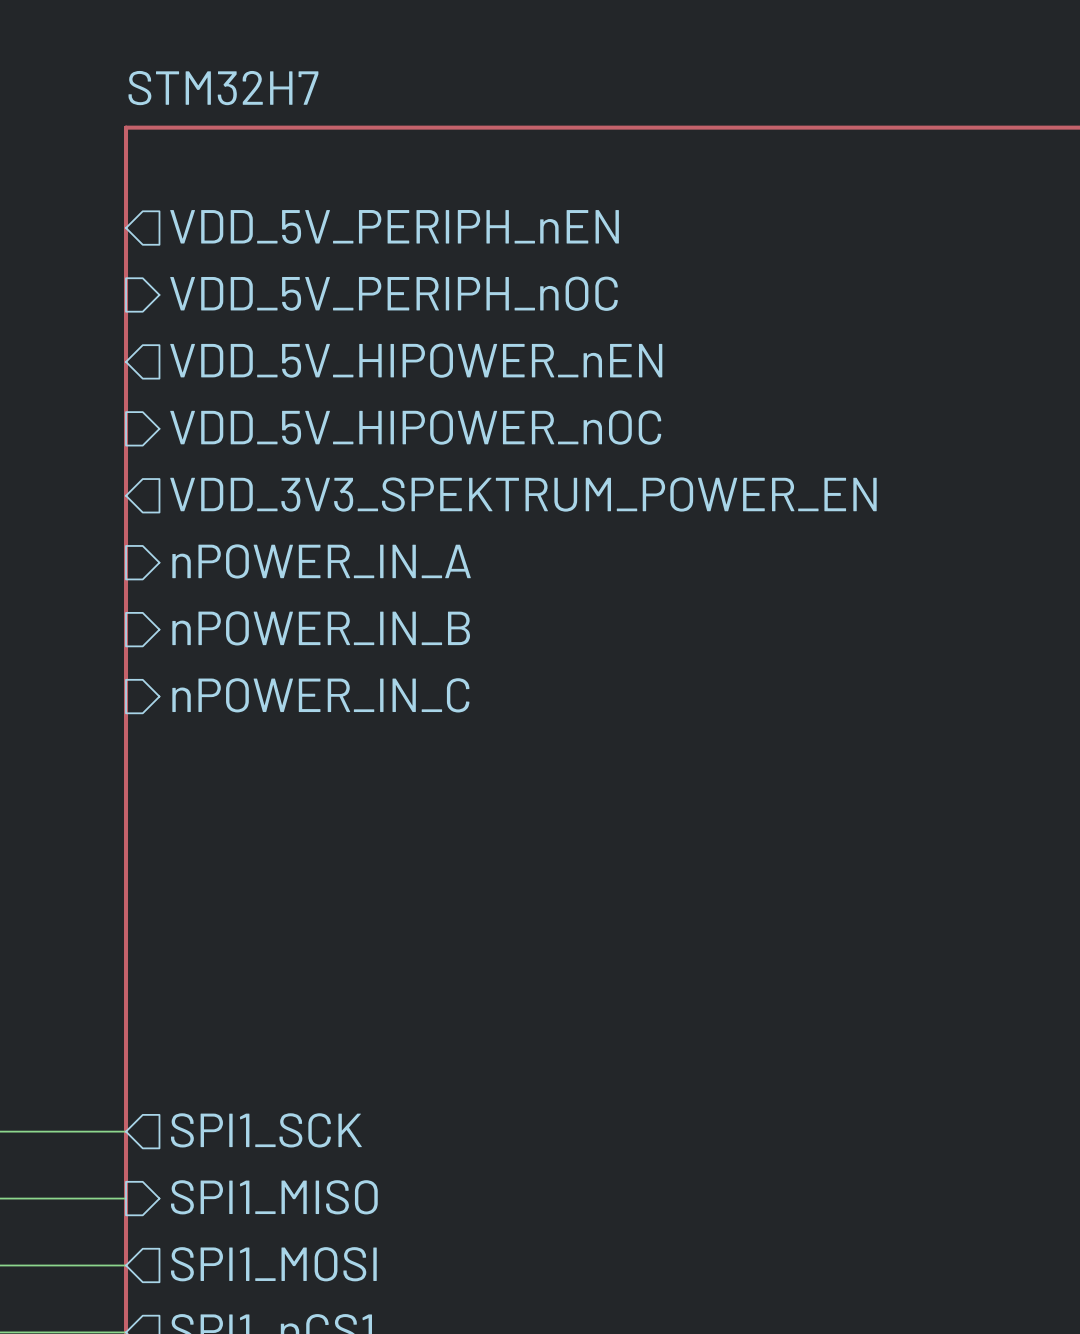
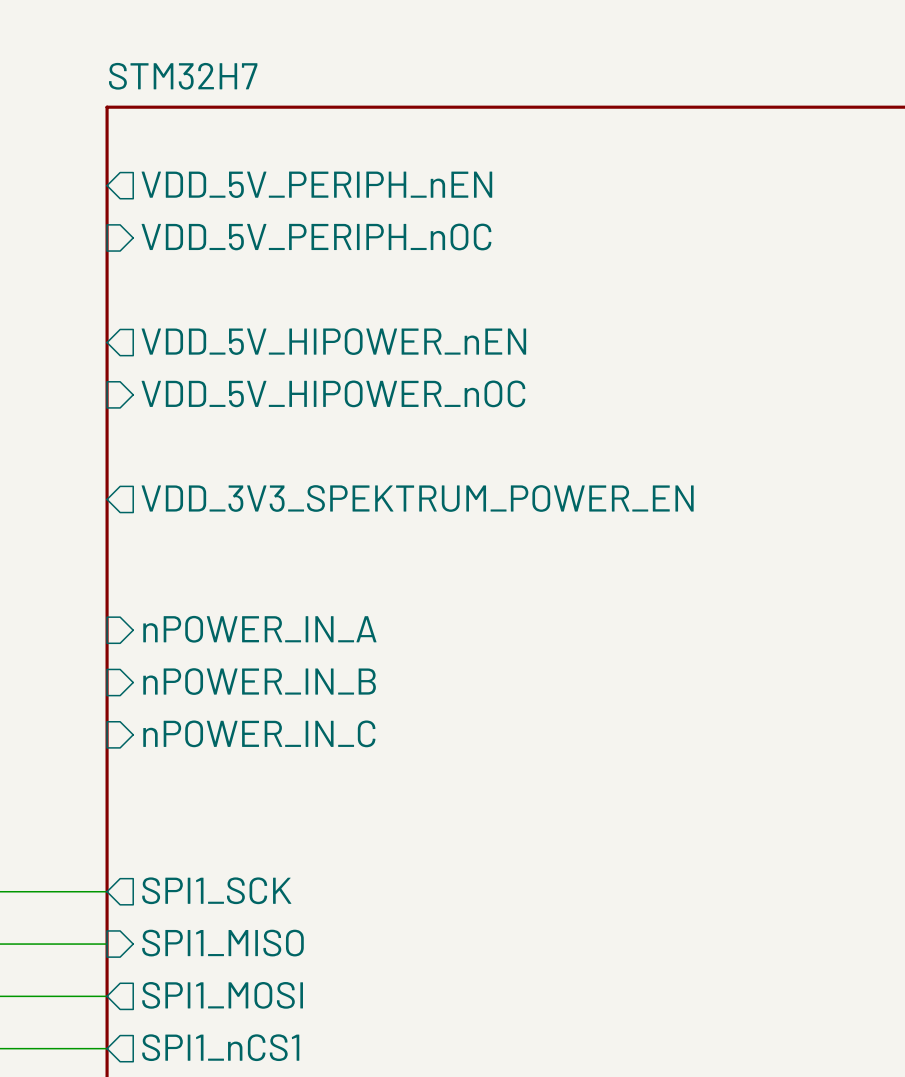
sheet pin: VDD_5V_HIPOWER_nEN (416, 360) -> none
sheet pin shape: input (415, 427) -> output (333, 341)
sheet pin: VDD_5V_HIPOWER_nOC (415, 427) -> VDD_5V_HIPOWER_nEN (333, 341)
sheet pin shape: output (523, 494) -> input (333, 393)
sheet pin: VDD_3V3_SPEKTRUM_POWER_EN (523, 494) -> VDD_5V_HIPOWER_nOC (333, 393)
sheet pin position: nPOWER_IN_A (321, 561) -> nPOWER_IN_A (259, 629)
sheet pin shape: input (321, 628) -> output (417, 498)
sheet pin: nPOWER_IN_B (321, 628) -> VDD_3V3_SPEKTRUM_POWER_EN (417, 498)
sheet pin position: nPOWER_IN_C (320, 695) -> nPOWER_IN_C (259, 733)
sheet pin: none -> nPOWER_IN_B (259, 681)

